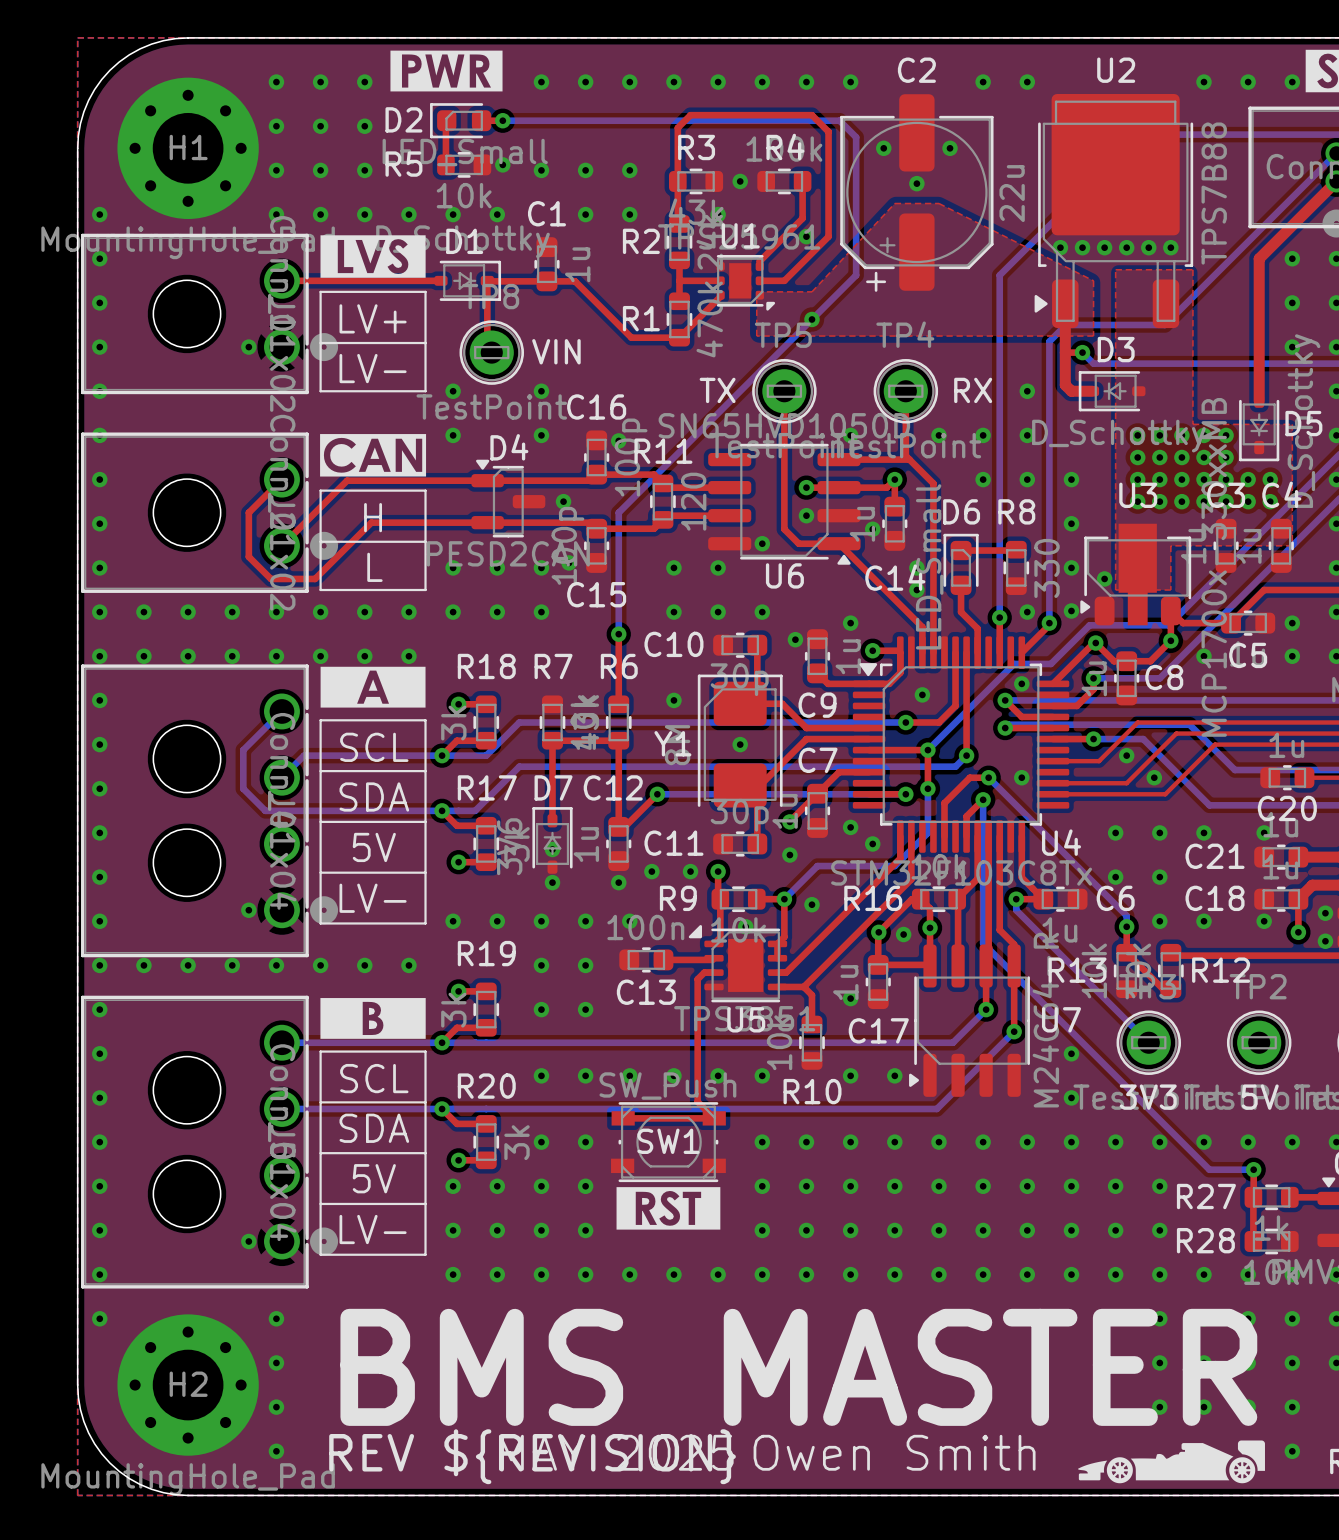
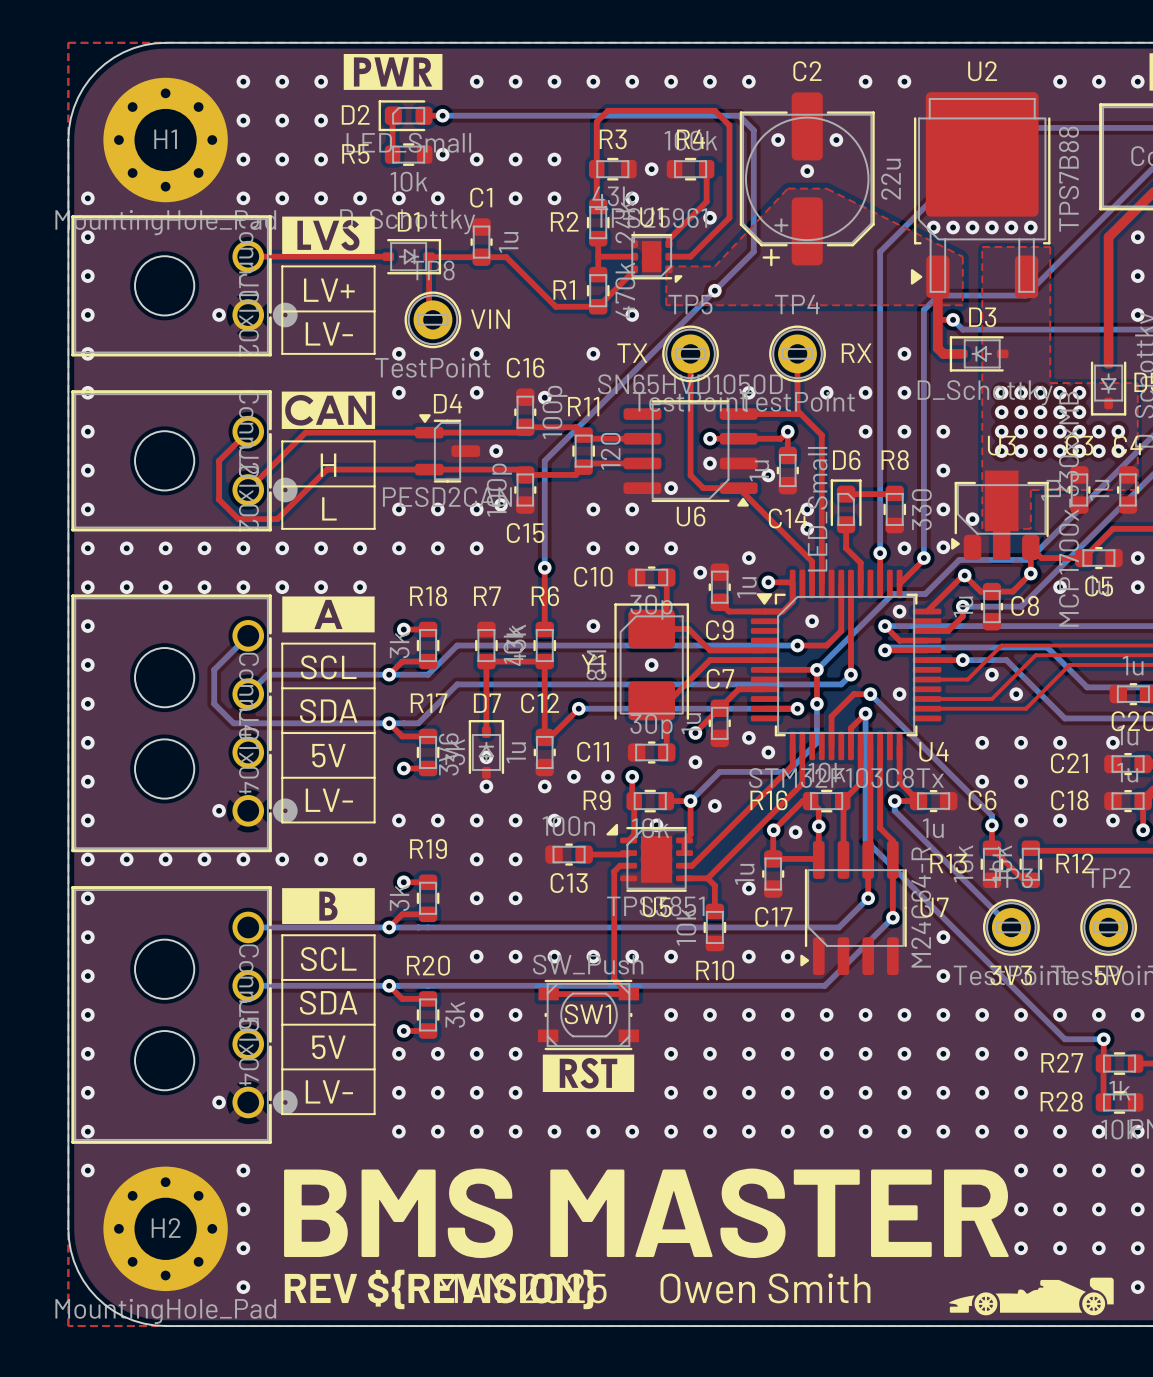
via: none -> (632, 315)
via: none -> (593, 353)

